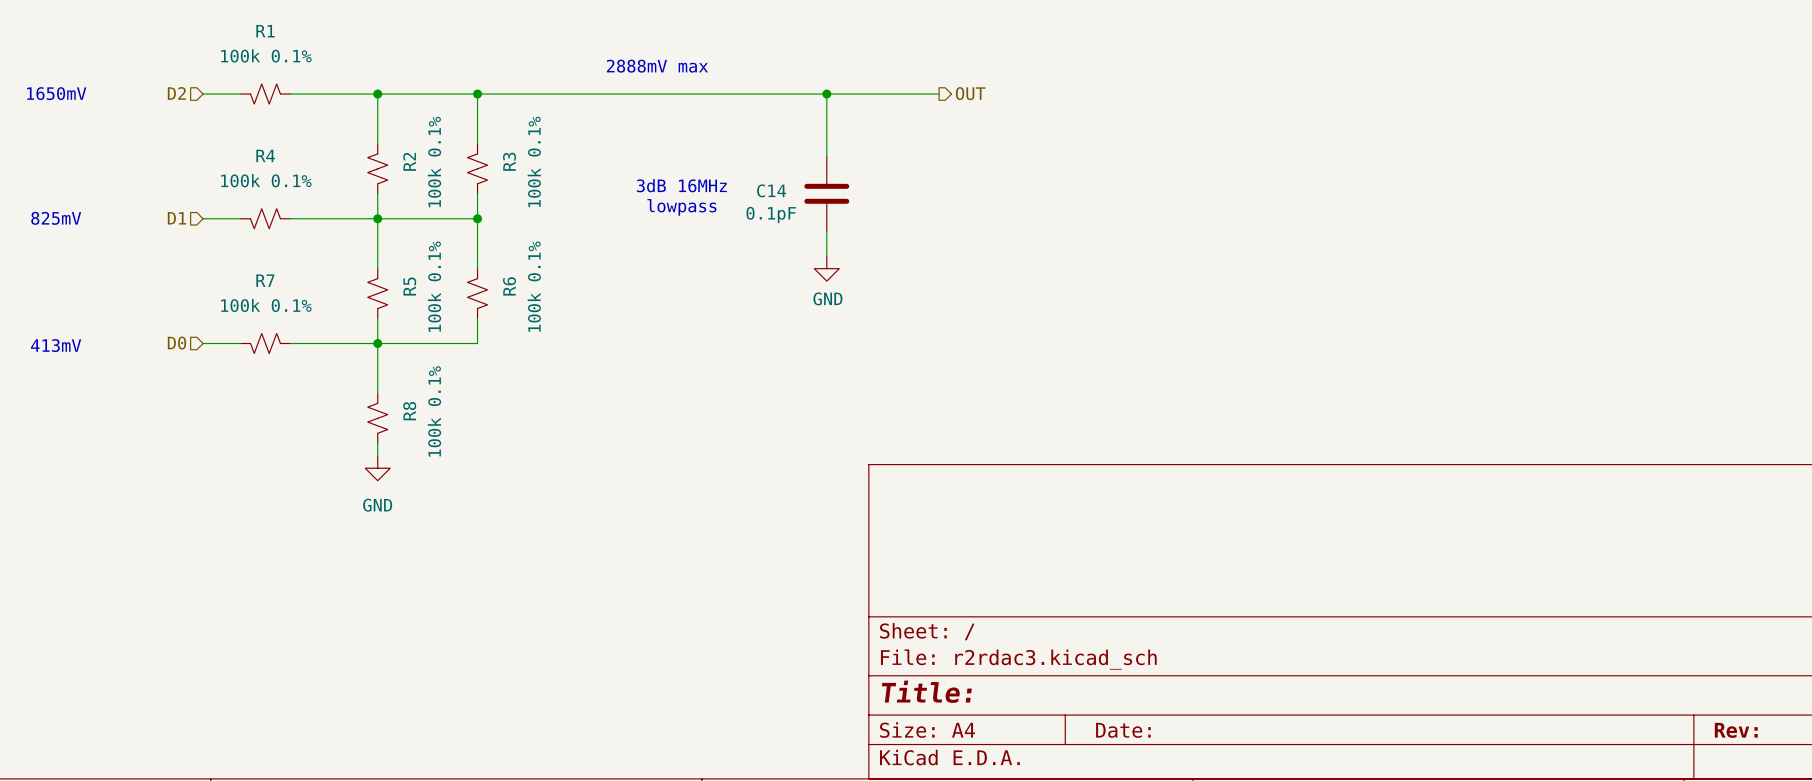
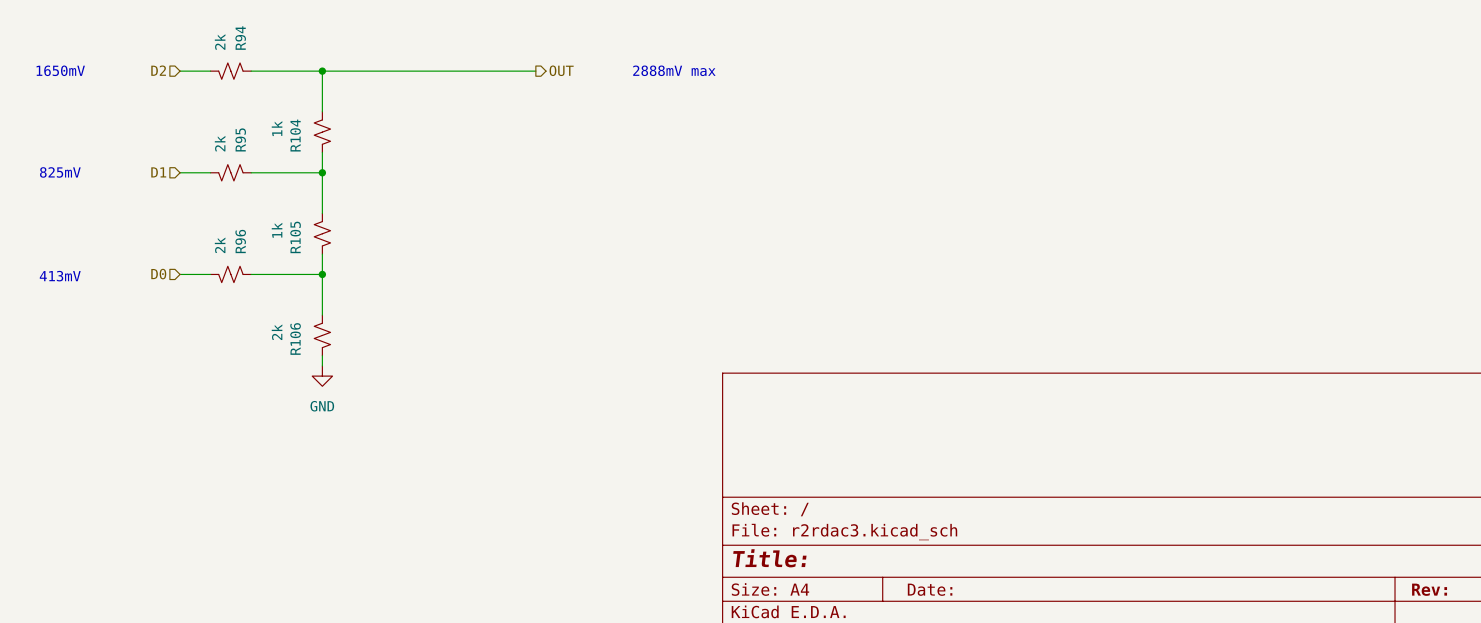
R1 name: R1 (265, 31) -> R94 (240, 38)
R1 value: 100k 0.1% (266, 55) -> 2k (220, 41)
text position: 2888mV max (657, 66) -> 2888mV max (674, 70)
hierarchical label: none -> OUT (561, 70)
hierarchical label: OUT (970, 93) -> none
wire: (477, 94) (477, 143) -> none
junction: (477, 94) -> none
wire: (639, 94) (939, 94) -> none
wire: (826, 94) (826, 156) -> none
junction: (826, 94) -> none
R4 name: R4 (265, 155) -> R95 (240, 139)
R2 name: R2 (409, 161) -> R104 (295, 135)
R2 value: 100k 0.1% (434, 161) -> 1k (277, 128)
R3: 100k 0.1% (477, 168) -> none
R4 value: 100k 0.1% (266, 180) -> 2k (220, 143)
text: 3dB 16MHz (681, 185) -> none
wire: (477, 193) (477, 268) -> none
C14: 0.1pF (826, 193) -> none
text: lowpass (681, 207) -> none
wire: (377, 218) (477, 218) -> none
junction: (477, 218) -> none
wire: (826, 231) (826, 256) -> none
power symbol: GND (826, 268) -> none
R7 name: R7 (265, 280) -> R96 (240, 241)
R5 name: R5 (409, 286) -> R105 (295, 237)
R5 value: 100k 0.1% (434, 286) -> 1k (277, 230)
R6: 100k 0.1% (477, 293) -> none
R7 value: 100k 0.1% (266, 305) -> 2k (220, 245)
wire: (477, 318) (477, 343) (377, 343) -> none
R8 name: R8 (409, 411) -> R106 (295, 338)
R8 value: 100k 0.1% (434, 411) -> 2k (277, 332)

